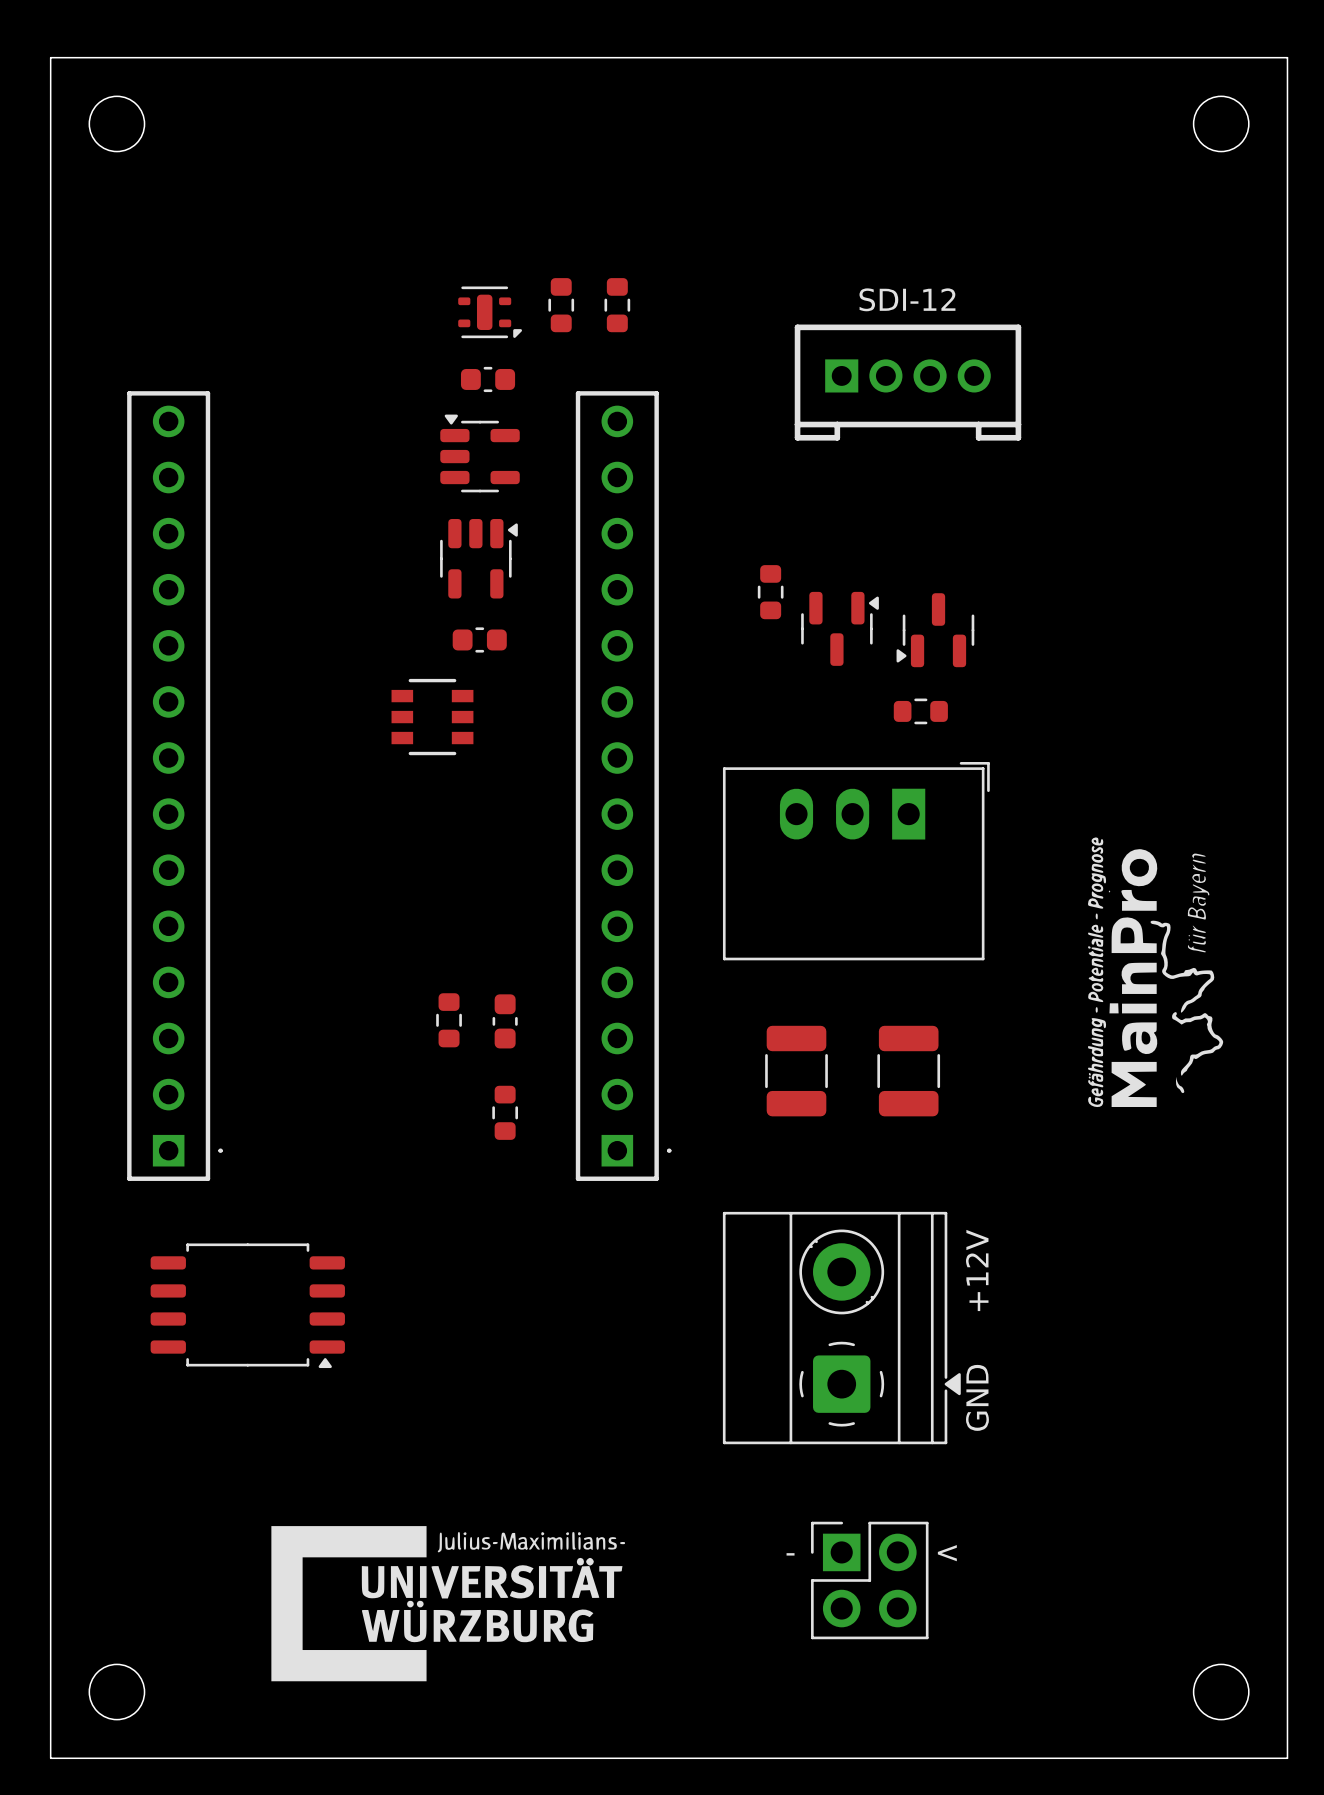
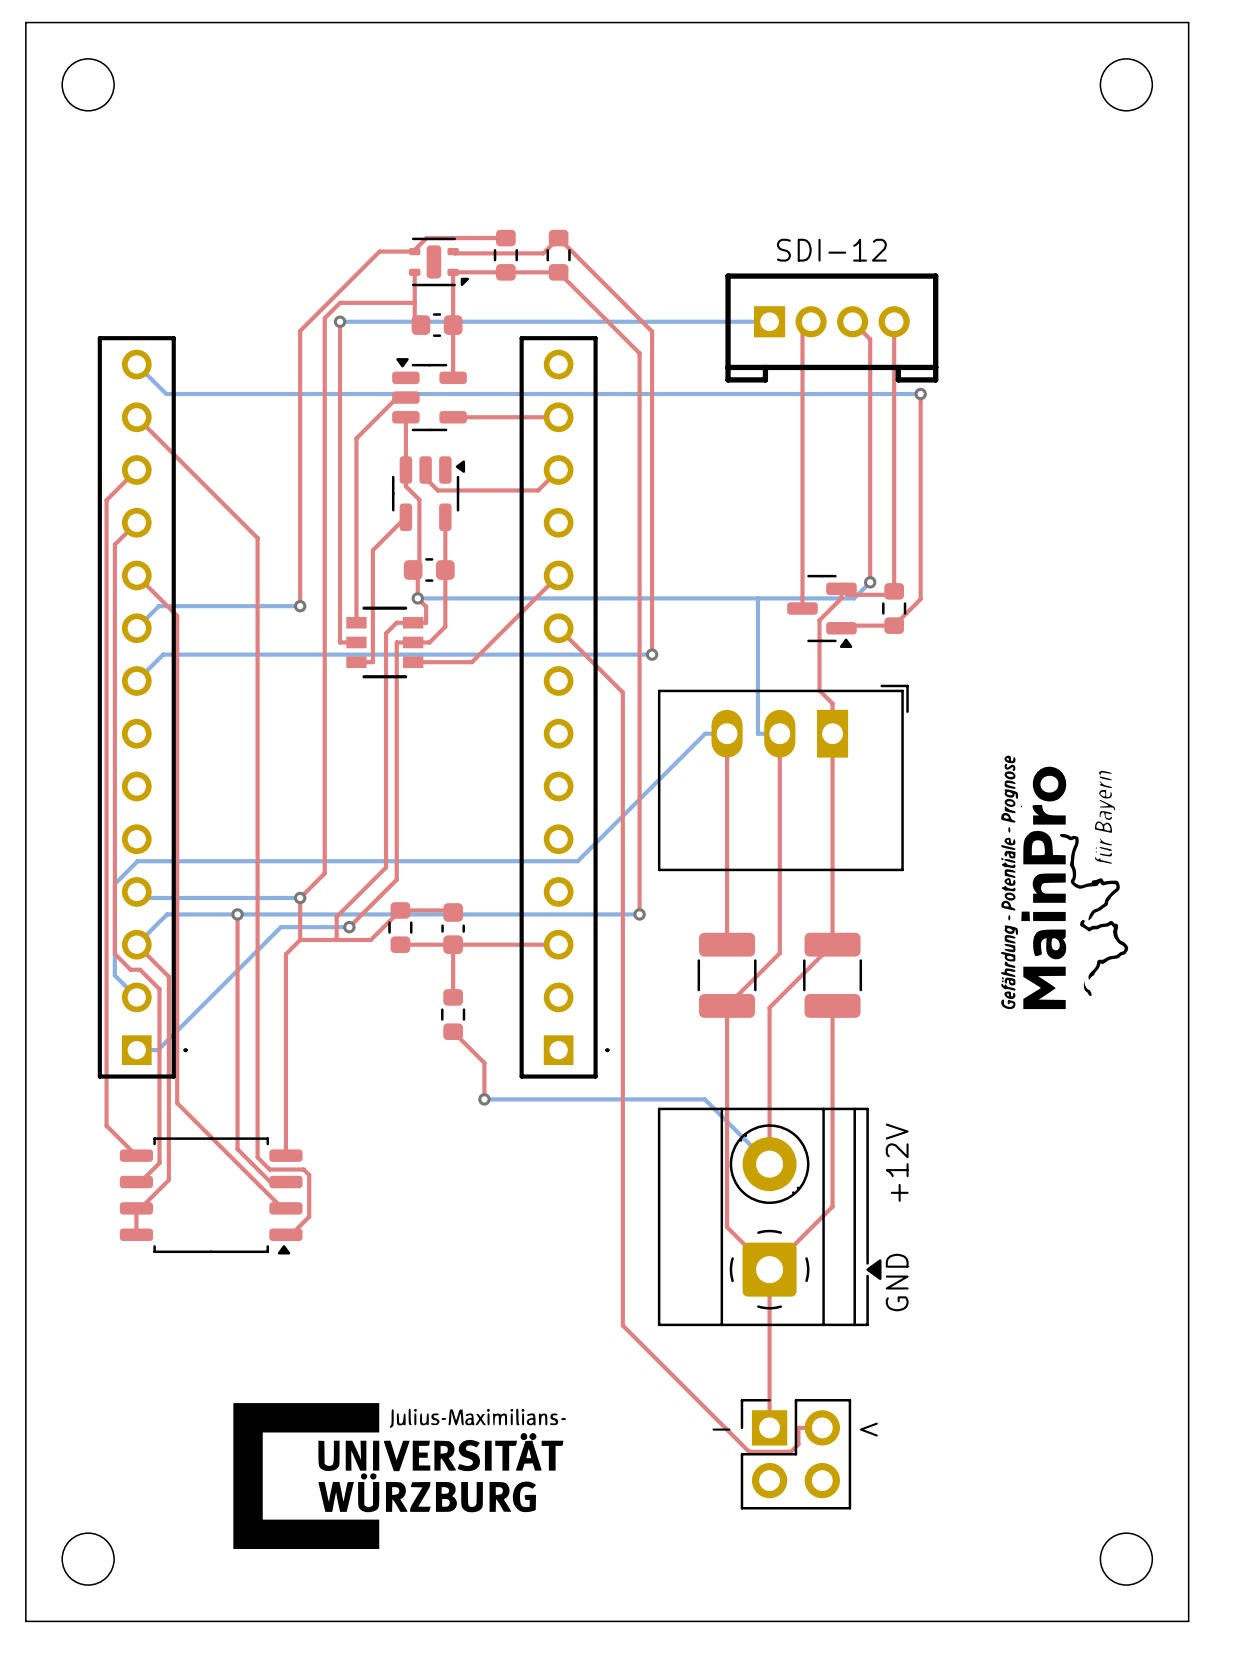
top track: none -> (505, 238) (426, 238) (414, 251) (379, 251) (300, 330) (300, 606)
top track: none -> (453, 251) (454, 253) (543, 253) (558, 238) (652, 331) (652, 654)
top track: none -> (414, 272) (414, 318) (420, 325)
top track: none -> (414, 302) (340, 302) (324, 318) (324, 873) (300, 897) (300, 940)
top track: none -> (340, 321) (340, 642) (356, 642)
bottom track: none -> (340, 321) (769, 321)
via: none -> (340, 321)
top track: none -> (811, 321) (802, 330) (802, 608)
top track: none -> (852, 321) (870, 339) (870, 582)
top track: none -> (894, 321) (894, 591) (890, 594) (847, 594) (841, 588) (841, 598) (819, 620) (819, 690) (832, 703) (832, 944) (769, 1007) (769, 1164)
bottom track: none -> (136, 364) (166, 394) (920, 394)
top track: none -> (453, 377) (453, 272) (558, 272) (639, 353) (639, 914)
top track: none -> (920, 394) (920, 599) (894, 625) (844, 625) (841, 628)
via: none -> (920, 394)
top track: none -> (405, 397) (397, 397) (356, 438) (356, 622)
top track: none -> (136, 417) (257, 538) (257, 1157) (269, 1169) (303, 1169) (309, 1175) (309, 1216) (291, 1234) (285, 1234)
top track: none -> (405, 417) (405, 486) (419, 499) (419, 563) (413, 570) (417, 574) (417, 598) (426, 606) (426, 622) (396, 622) (386, 633) (386, 867) (336, 916) (336, 940)
top track: none -> (453, 417) (558, 417)
top track: none -> (136, 470) (106, 500) (106, 1125) (136, 1155)
top track: none -> (425, 470) (425, 478) (437, 490) (538, 490) (558, 470)
top track: none -> (405, 517) (372, 550) (372, 662) (356, 662)
top track: none -> (445, 517) (445, 626) (429, 642) (396, 642) (396, 879) (349, 927)
top track: none -> (136, 522) (114, 544) (114, 954) (130, 969) (140, 969) (159, 989) (159, 1163) (140, 1182) (136, 1182)
part: (770, 592) -> none
part: (840, 628) -> none
part: (935, 630) -> none
top track: none -> (136, 575) (177, 615) (177, 1103) (282, 1208) (285, 1208)
top track: none -> (558, 575) (471, 662) (413, 662)
bottom track: none -> (870, 582) (854, 598) (417, 598)
via: none -> (870, 582)
via: none -> (417, 598)
bottom track: none -> (757, 598) (757, 733) (779, 733)
bottom track: none -> (300, 606) (158, 606) (136, 628)
via: none -> (300, 606)
part: none -> (821, 611)
top track: none -> (558, 628) (622, 692) (622, 1325) (749, 1451) (791, 1451) (798, 1444) (798, 1427) (822, 1427)
part rotation: 0° (920, 711) -> 90° clockwise (894, 608)
part position: (920, 711) -> (894, 608)
bottom track: none -> (652, 654) (163, 654) (136, 680)
via: none -> (652, 654)
top track: none -> (727, 733) (727, 944)
bottom track: none -> (727, 733) (705, 733) (577, 861) (137, 861) (114, 883) (114, 975) (136, 997)
top track: none -> (779, 733) (779, 953) (727, 1005) (727, 1227) (769, 1269)
bottom track: none -> (136, 891) (142, 897) (300, 897)
via: none -> (300, 897)
top track: none -> (453, 912) (451, 910) (400, 910) (370, 940) (300, 940)
top track: none -> (237, 914) (237, 1149) (270, 1182) (285, 1182)
via: none -> (237, 914)
bottom track: none -> (639, 914) (167, 914) (136, 944)
via: none -> (639, 914)
bottom track: none -> (349, 927) (280, 927) (157, 1050) (136, 1050)
via: none -> (349, 927)
top track: none -> (300, 940) (285, 954) (285, 1155)
top track: none -> (136, 944) (168, 976) (168, 1180) (140, 1208) (136, 1208) (136, 1234)
top track: none -> (400, 944) (558, 944)
top track: none -> (453, 944) (453, 997)
top track: none -> (832, 1005) (832, 1206) (769, 1269)
top track: none -> (453, 1031) (484, 1062) (484, 1099)
bottom track: none -> (484, 1099) (704, 1099) (769, 1164)
via: none -> (484, 1099)
top track: none -> (769, 1269) (769, 1427)

